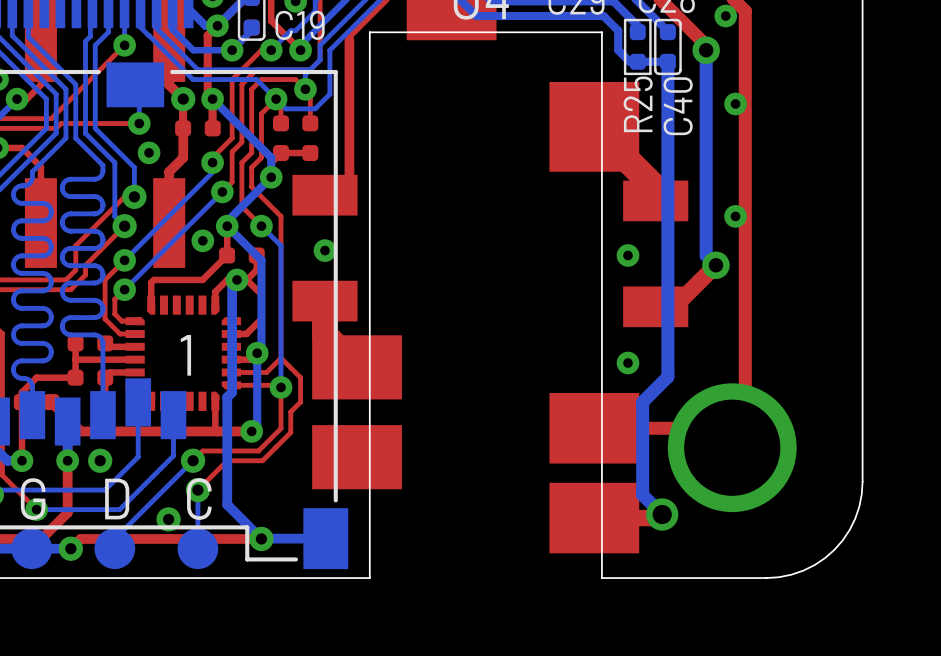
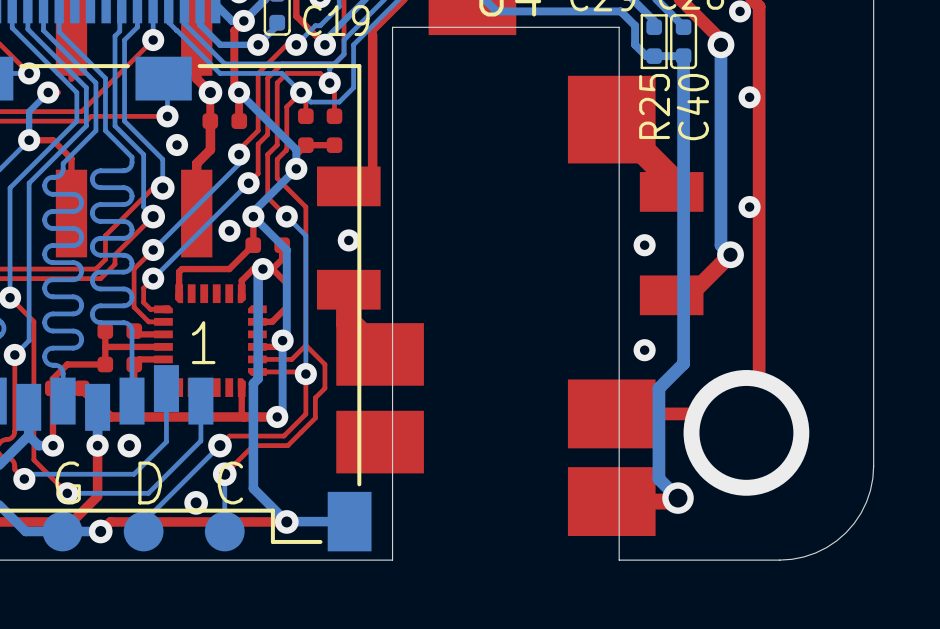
top track: (40, 85) (26, 99) -> none

